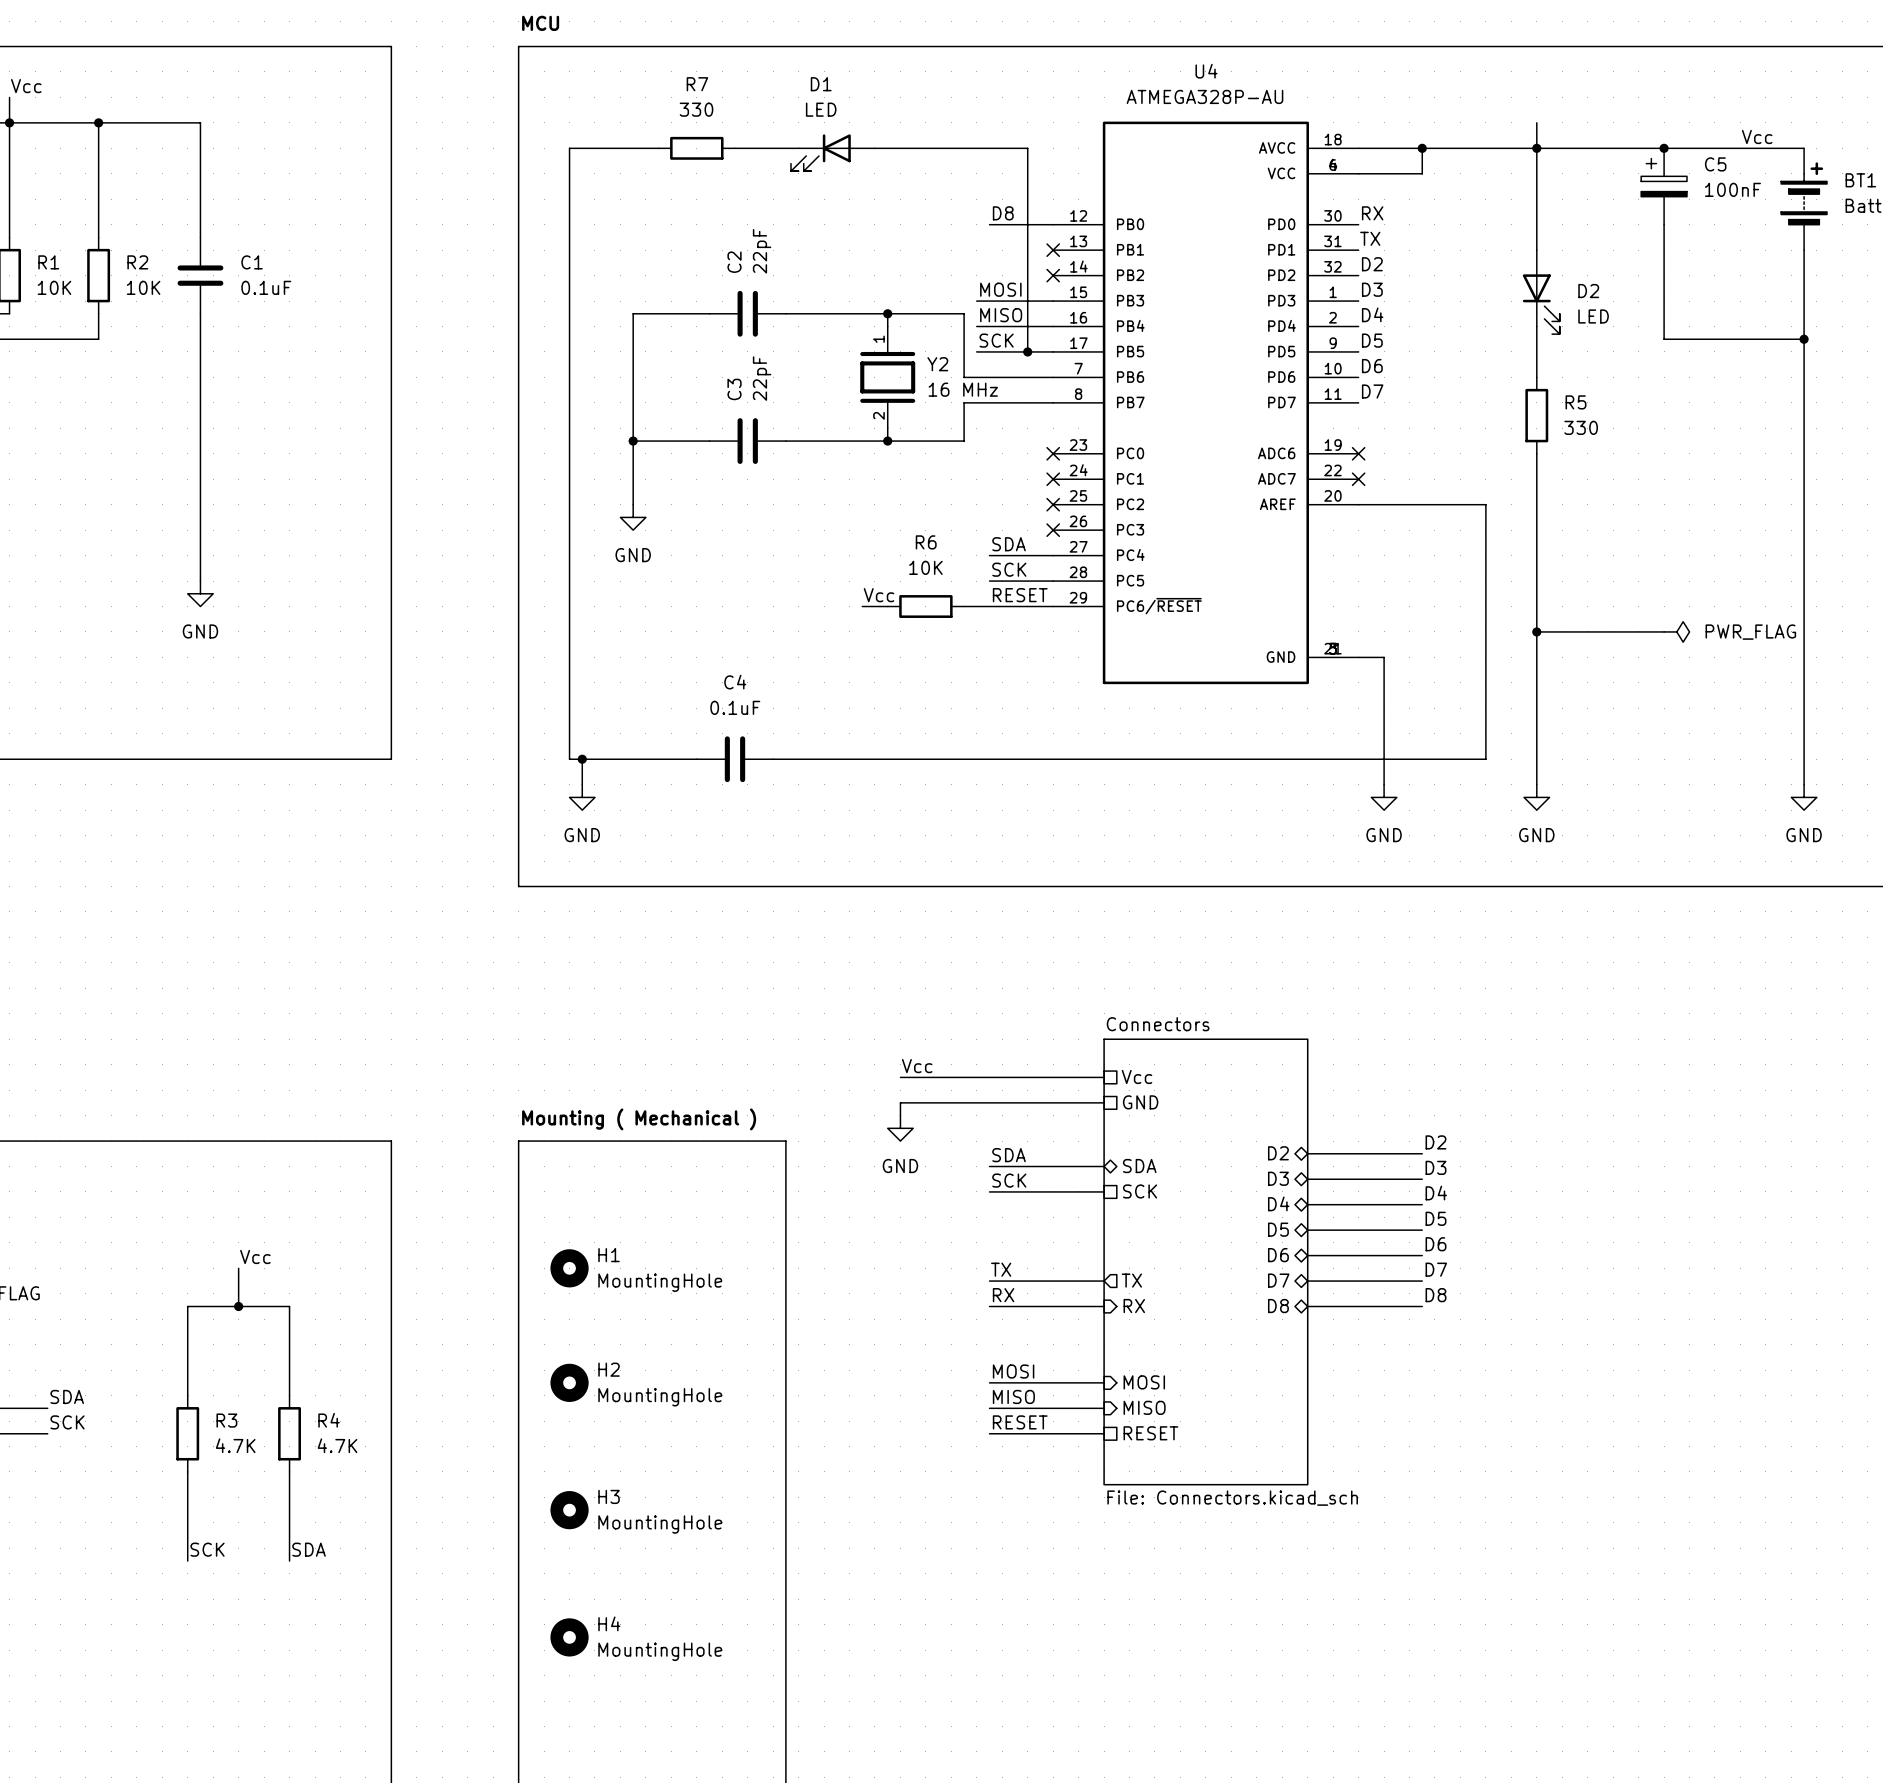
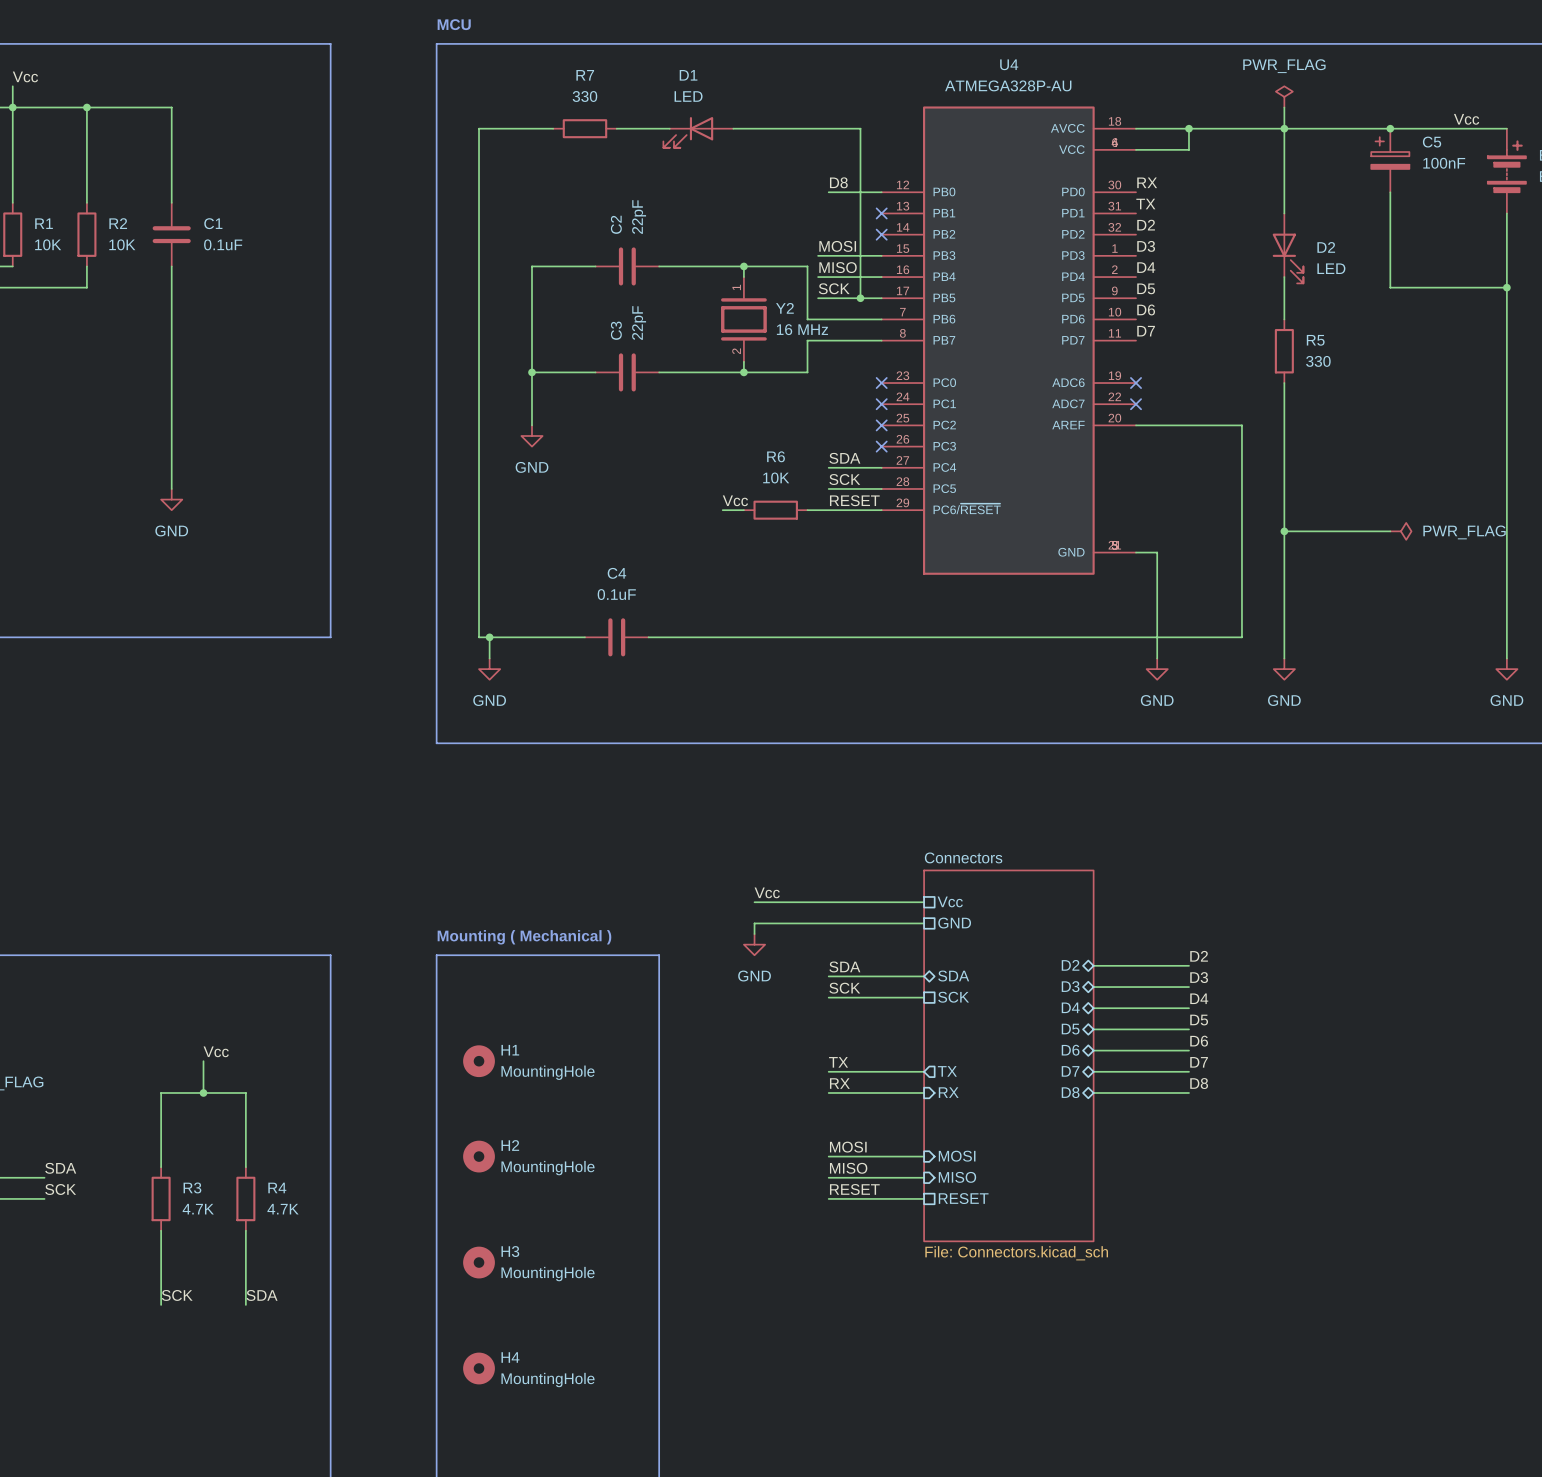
power symbol: none -> PWR_FLAG (1284, 96)

